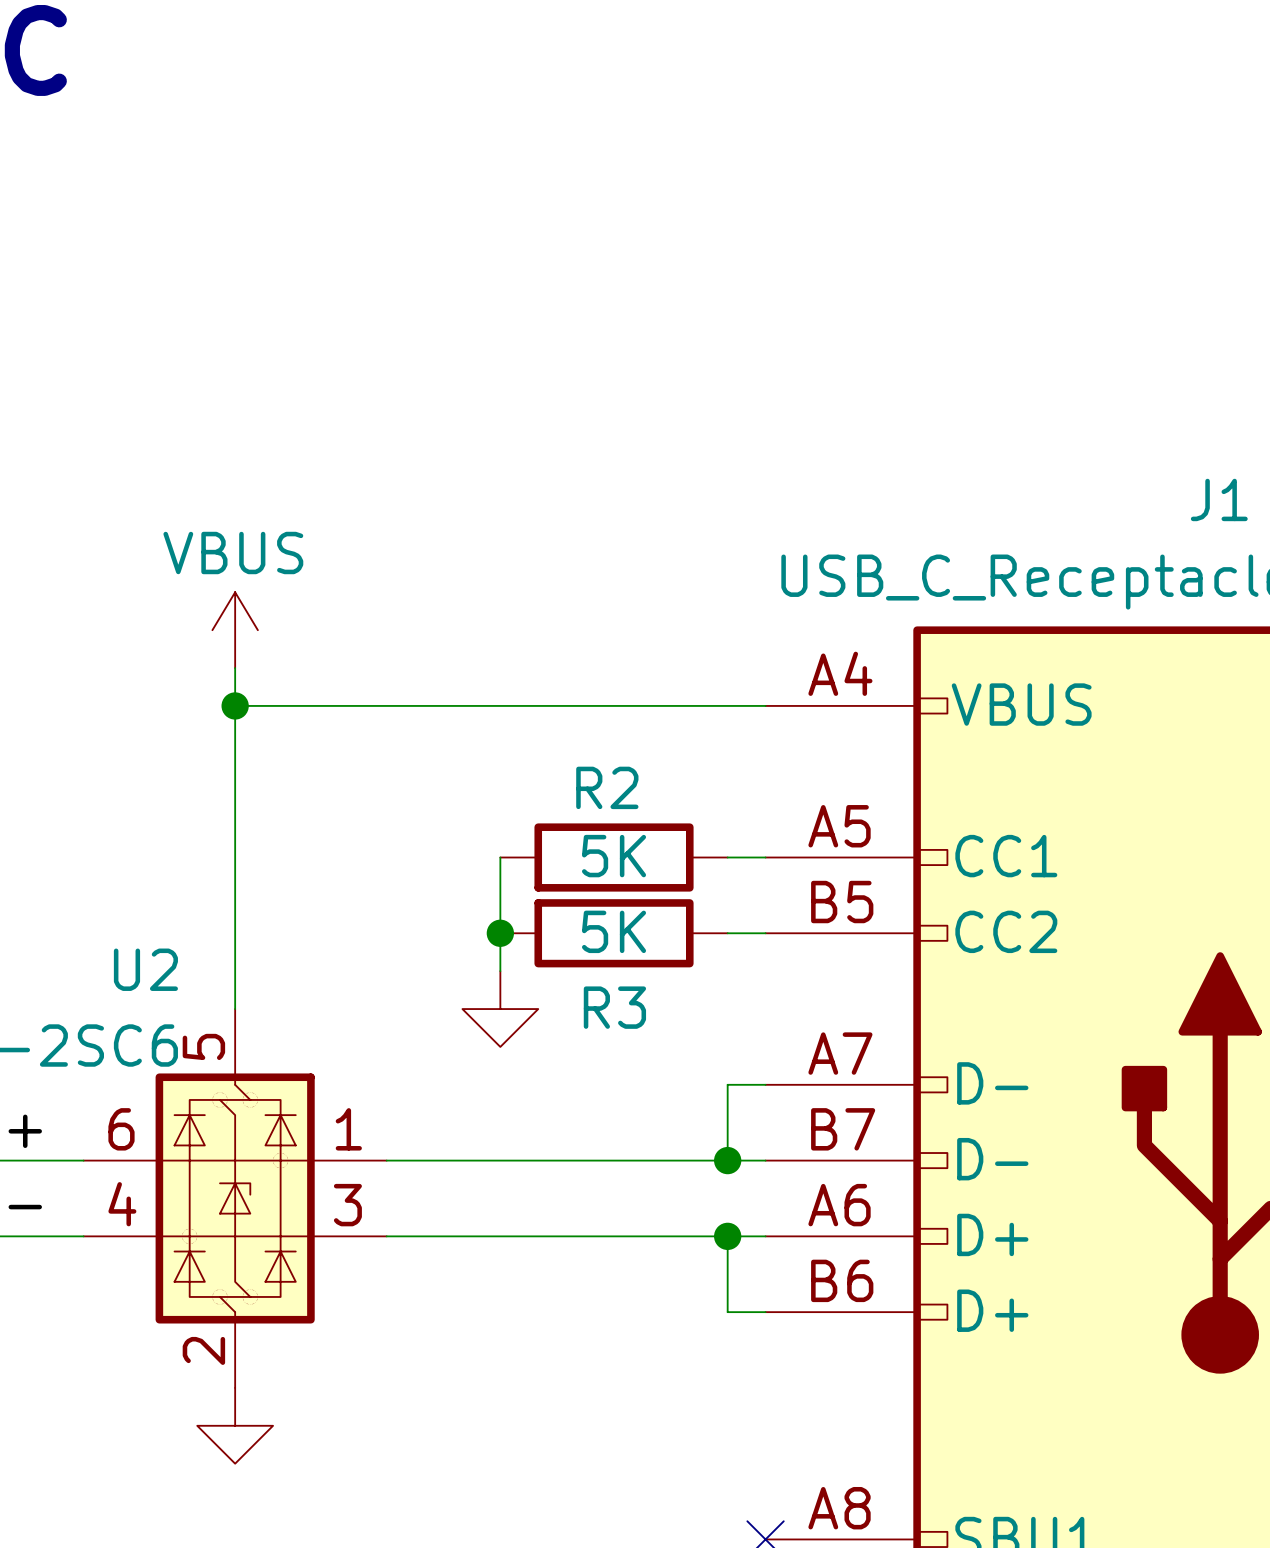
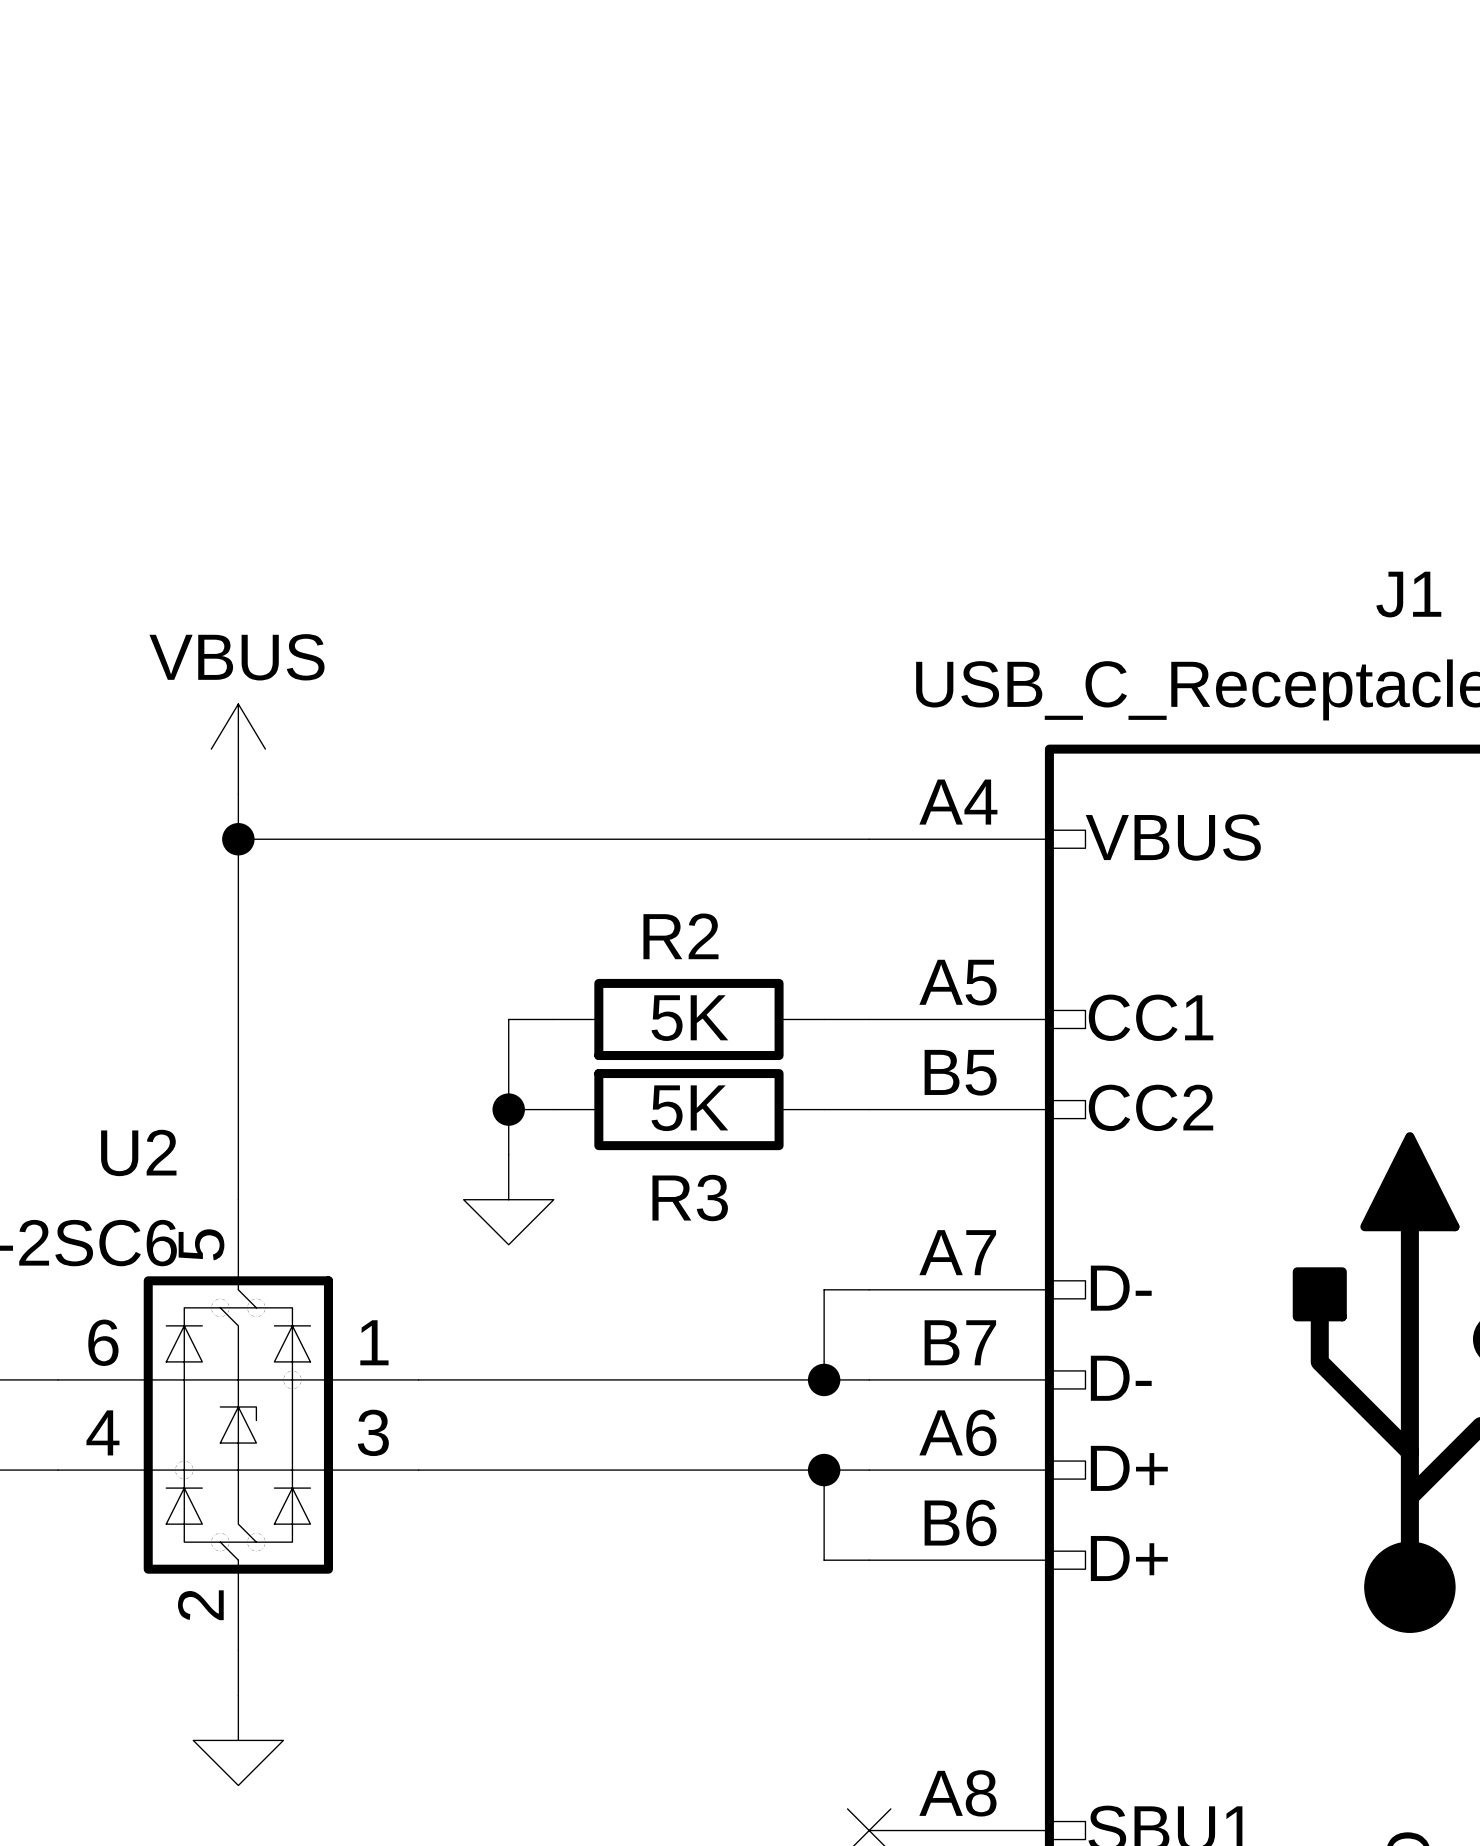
wire: (500, 857) (500, 971) -> (553, 1019) (508, 1019) (508, 1154)
wire: none -> (508, 1109) (553, 1109)
junction position: (500, 933) -> (508, 1109)
power symbol position: (500, 1009) -> (508, 1199)
power symbol position: (235, 1425) -> (238, 1740)

